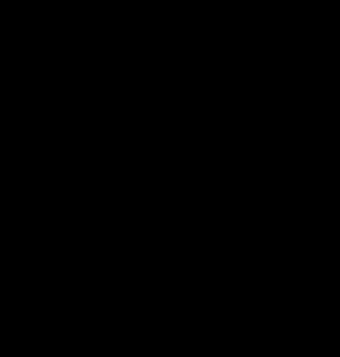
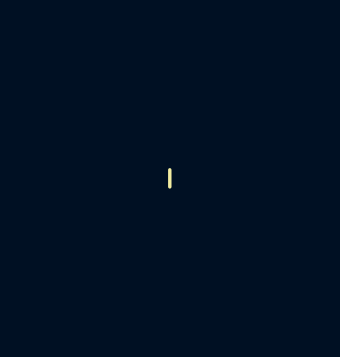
line: none -> (169, 169) (169, 186)

